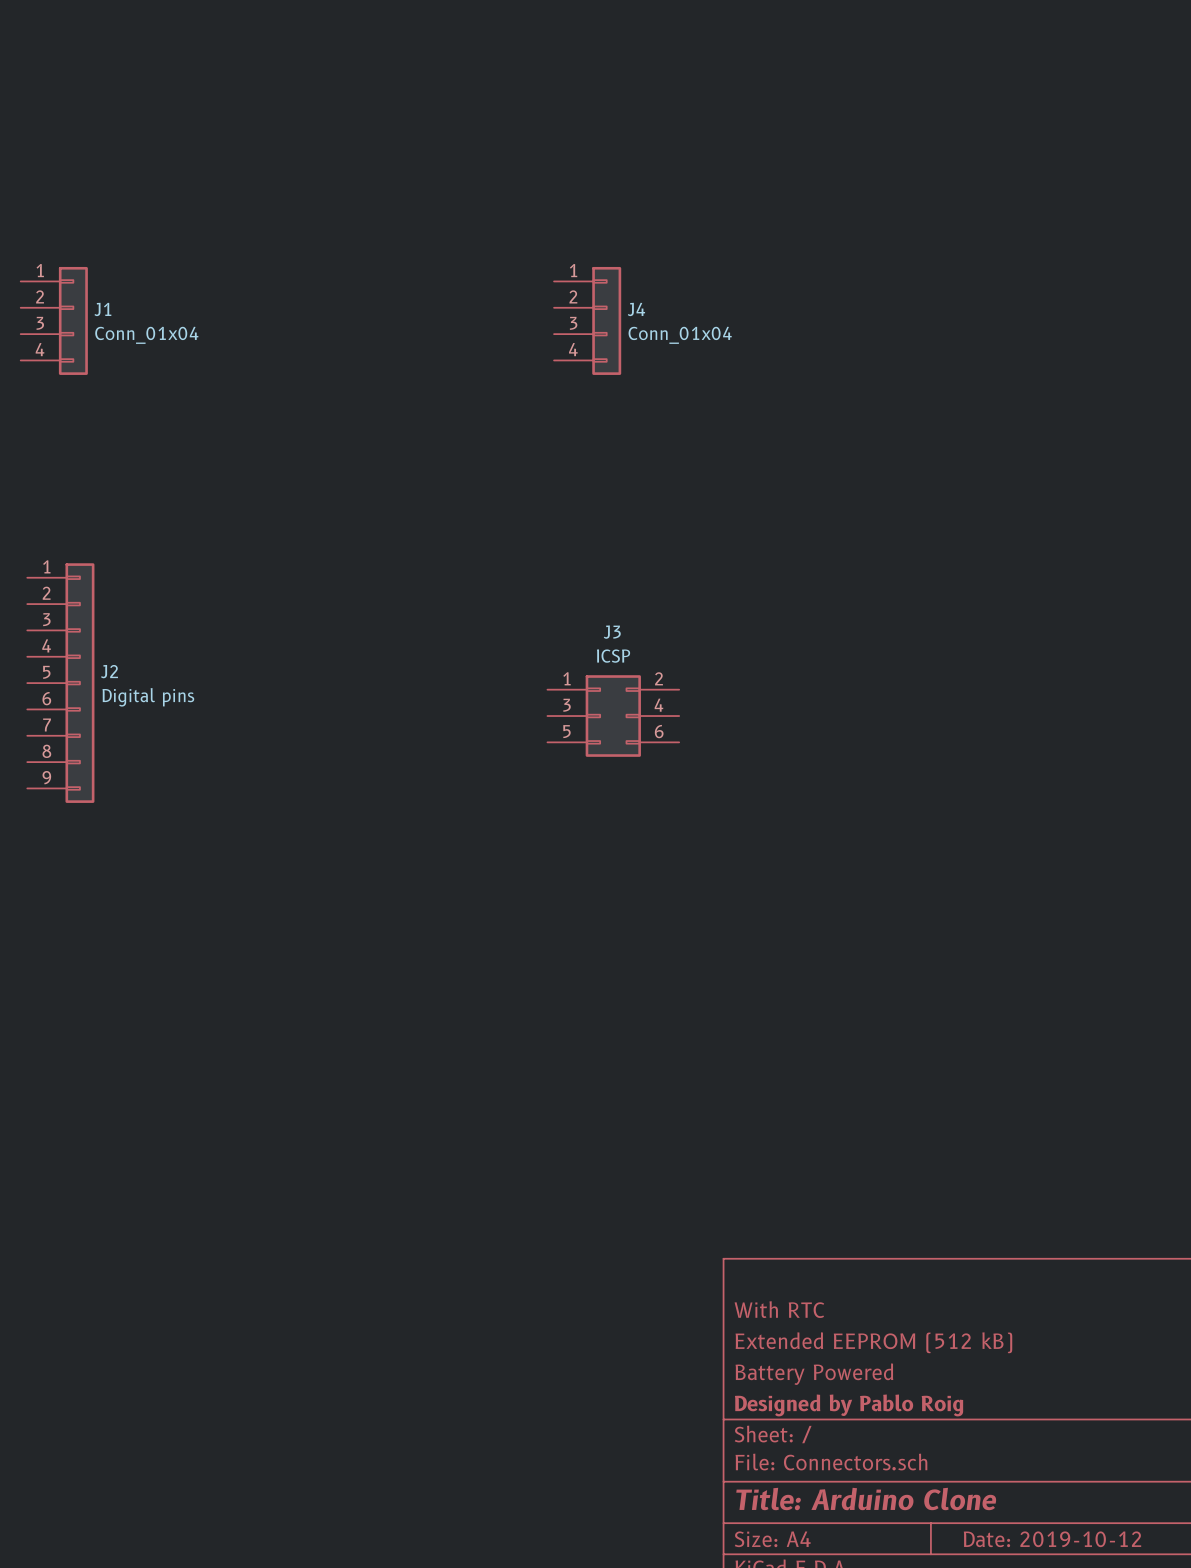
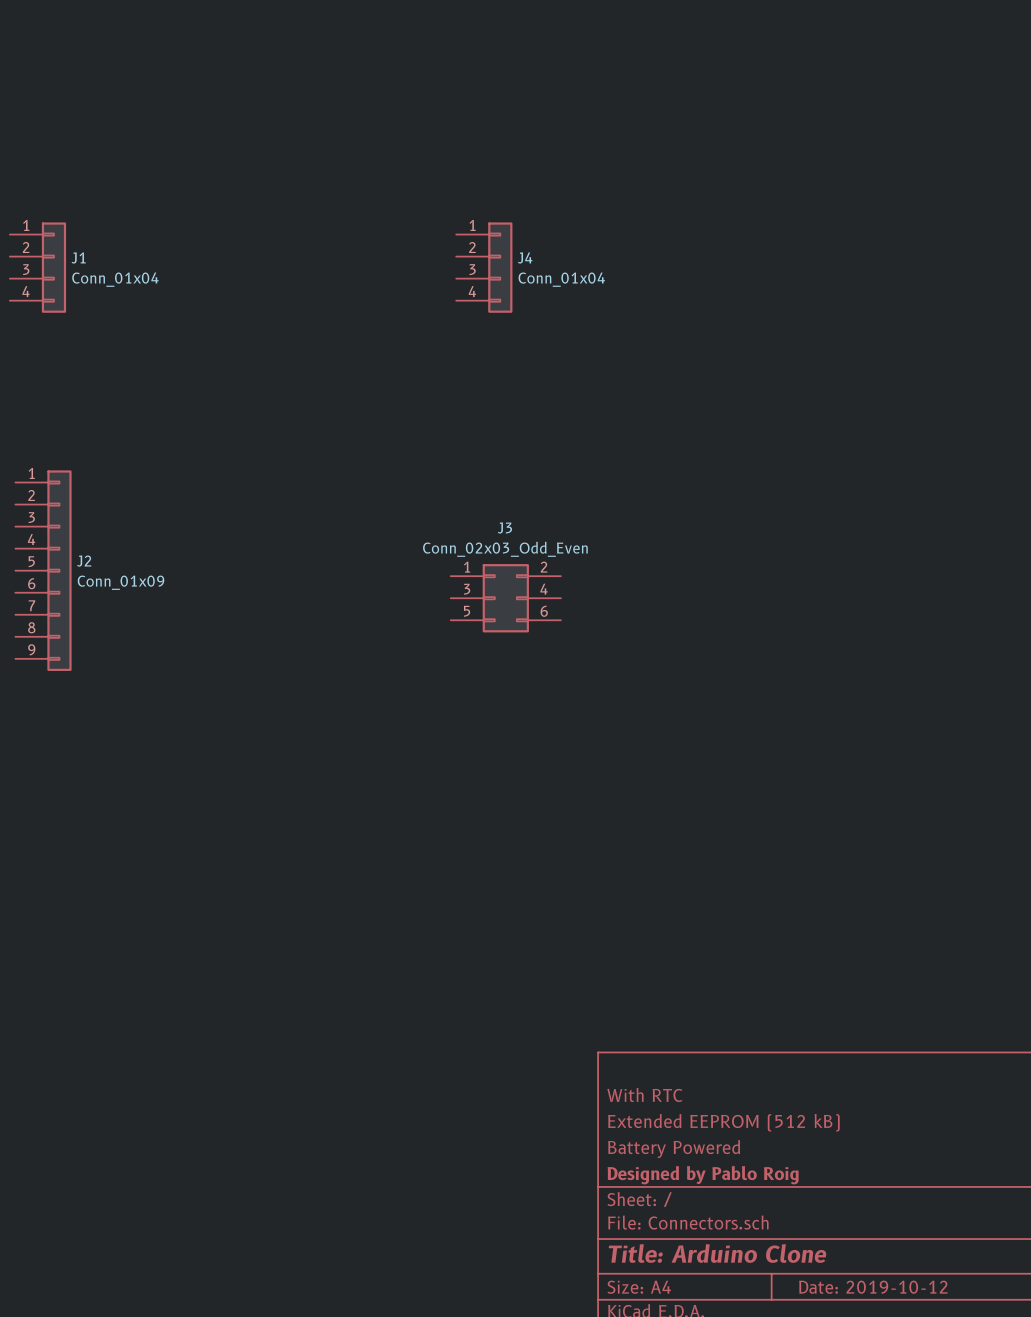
J3 value: ICSP (613, 656) -> Conn_02x03_Odd_Even (505, 549)
J2 value: Digital pins (148, 697) -> Conn_01x09 (121, 582)

